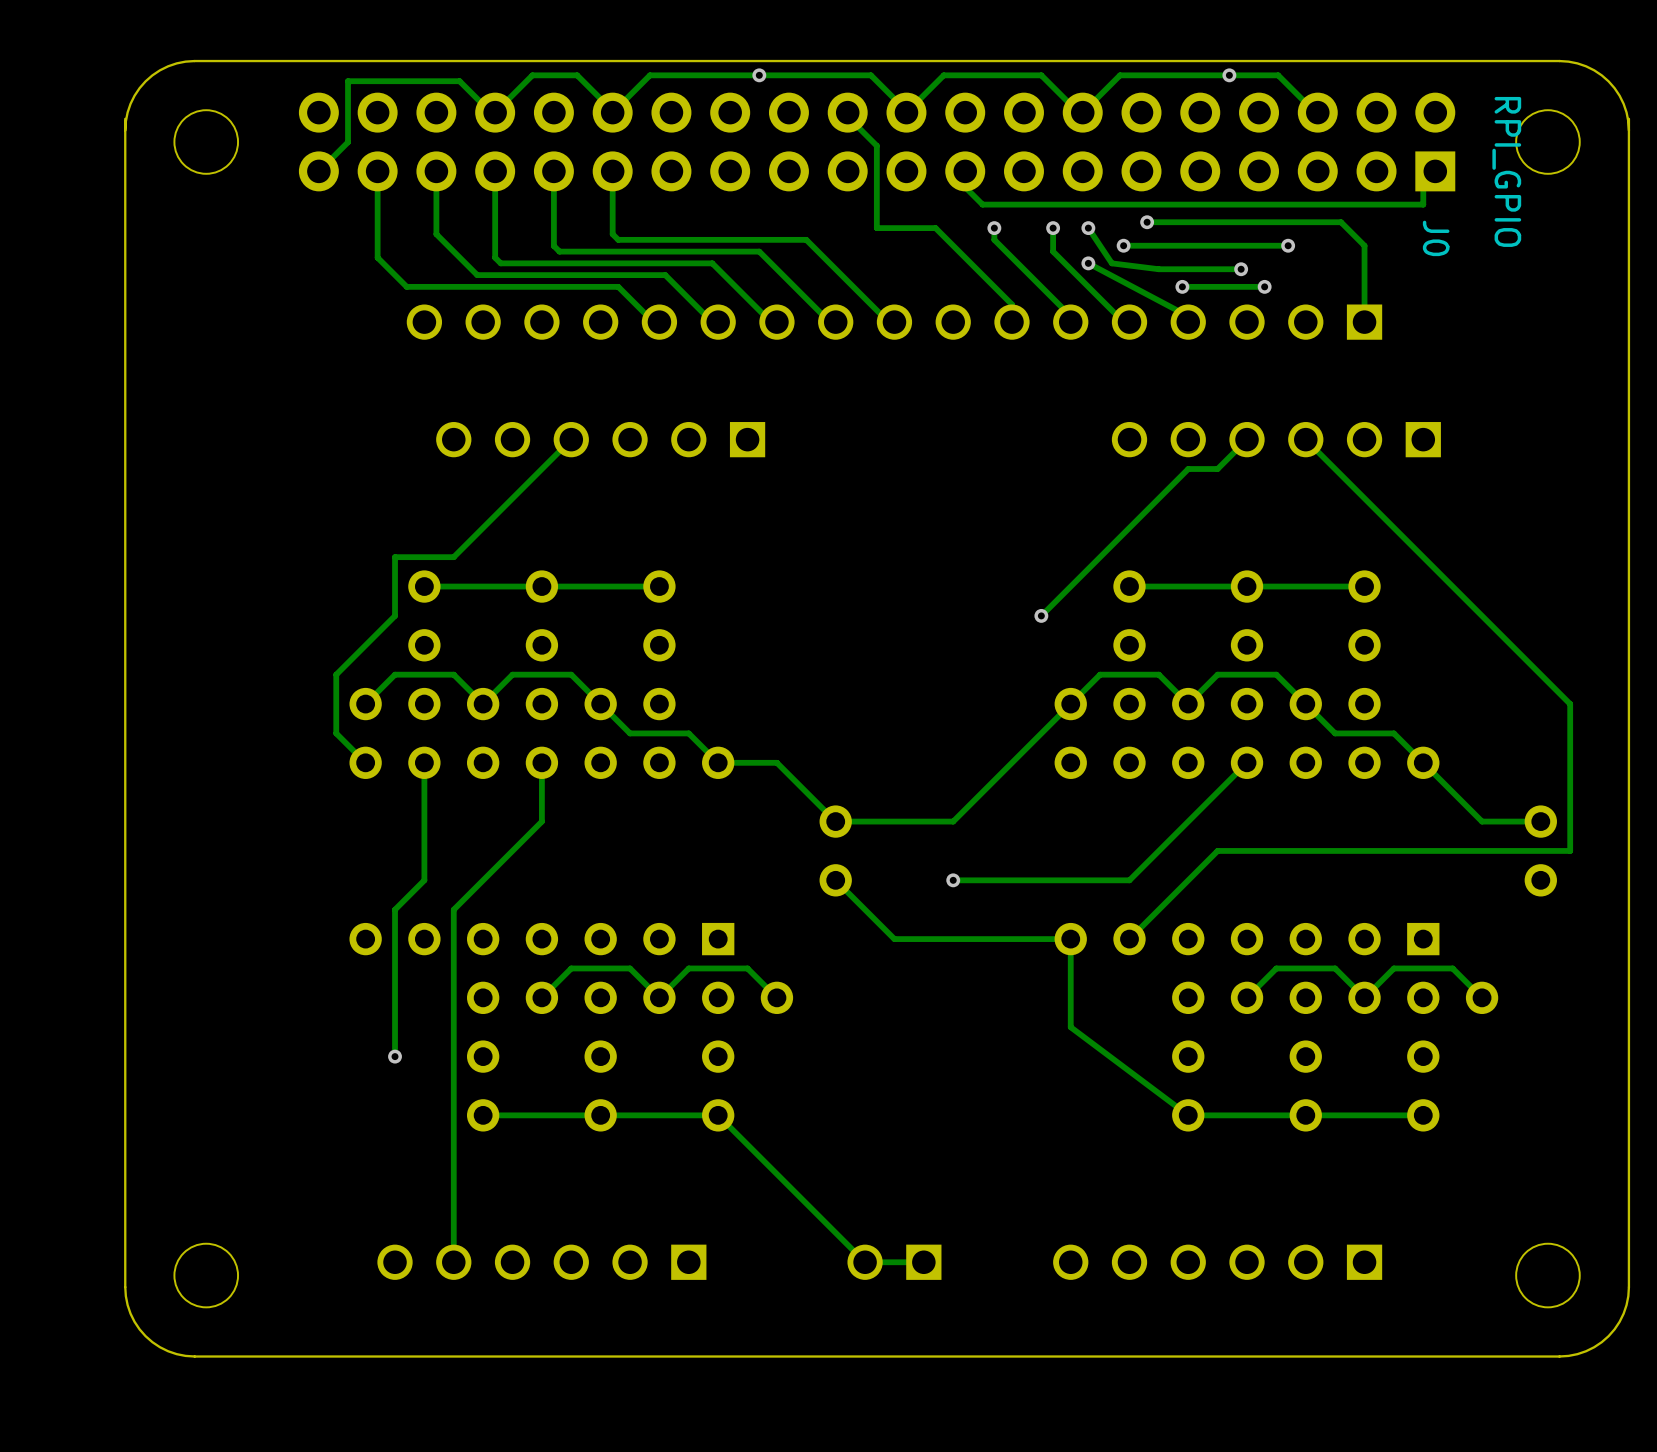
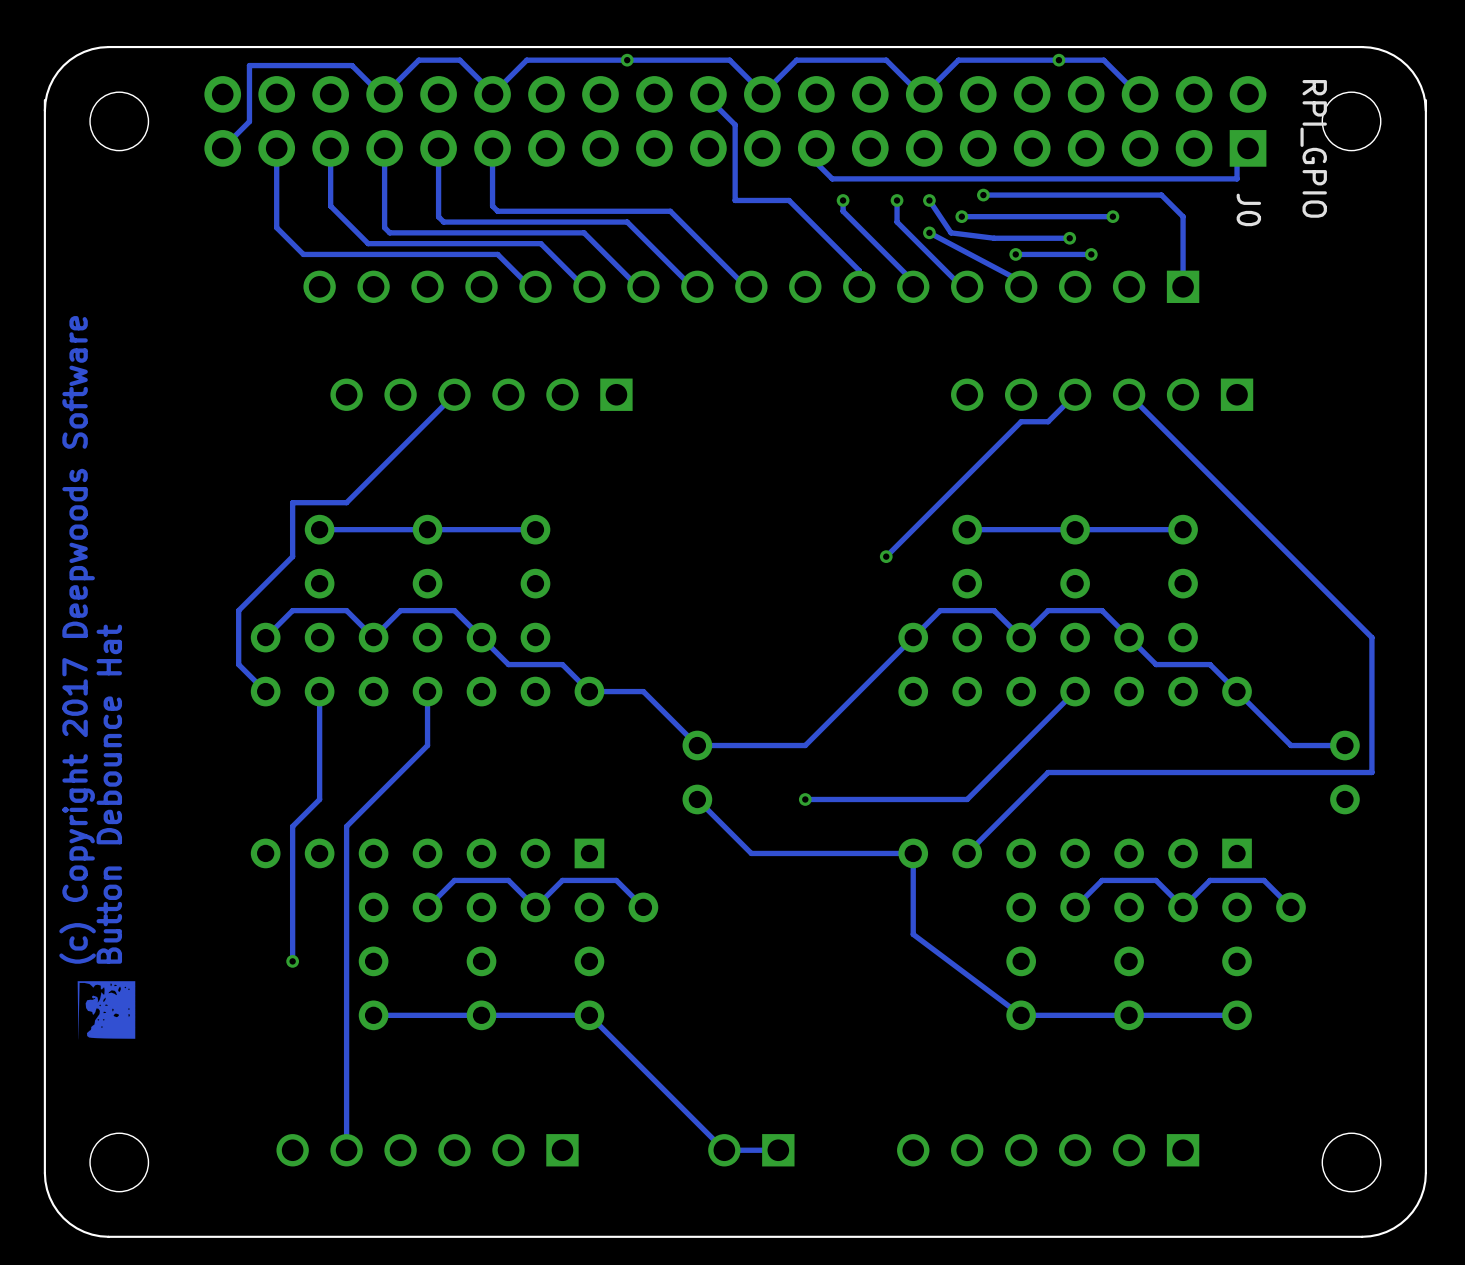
text: none -> (c) Copyright 2017 Deepwoods Software (77, 639)
text: none -> Button Debounce Hat (109, 794)
drawing: none -> [77, 981, 136, 1040]

